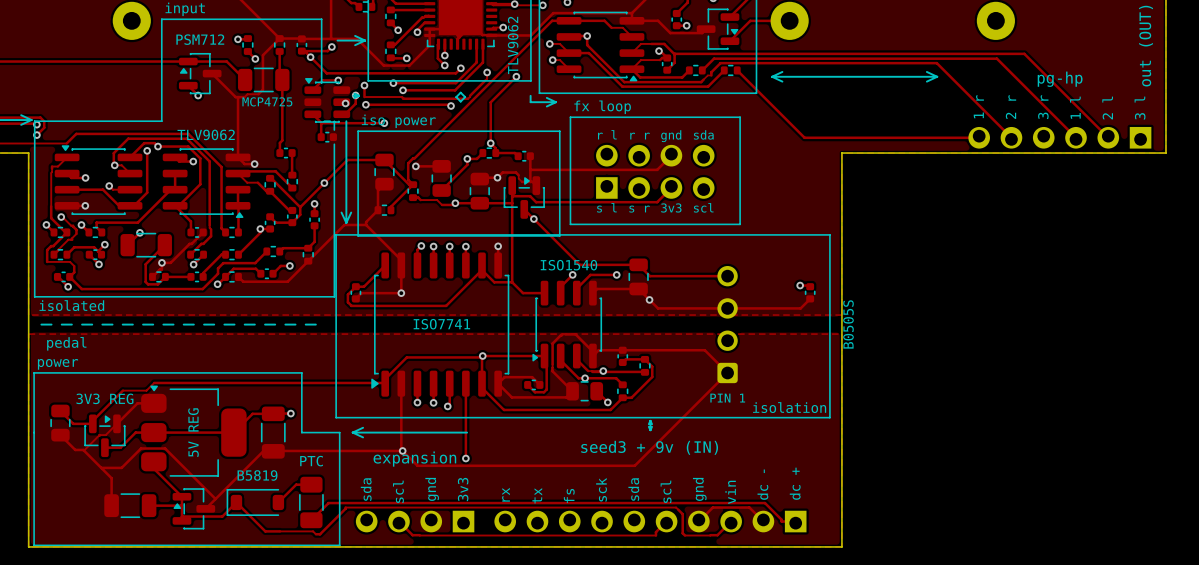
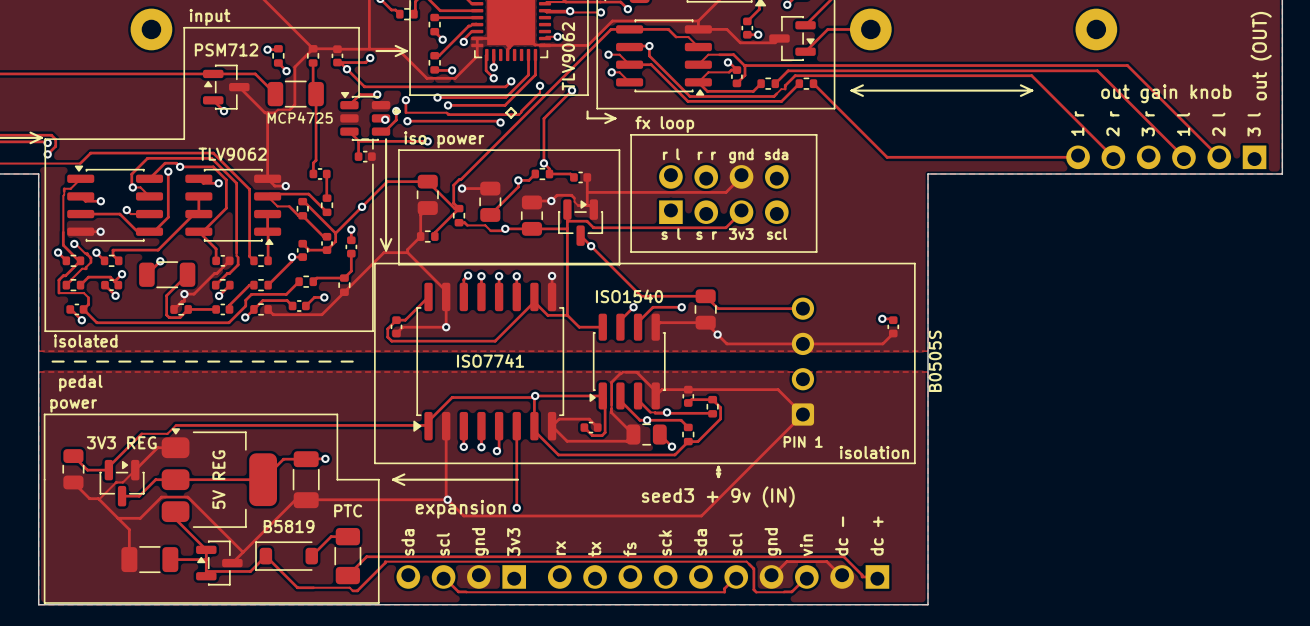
text: pg-hp (1060, 79) -> out gain knob (1166, 93)

